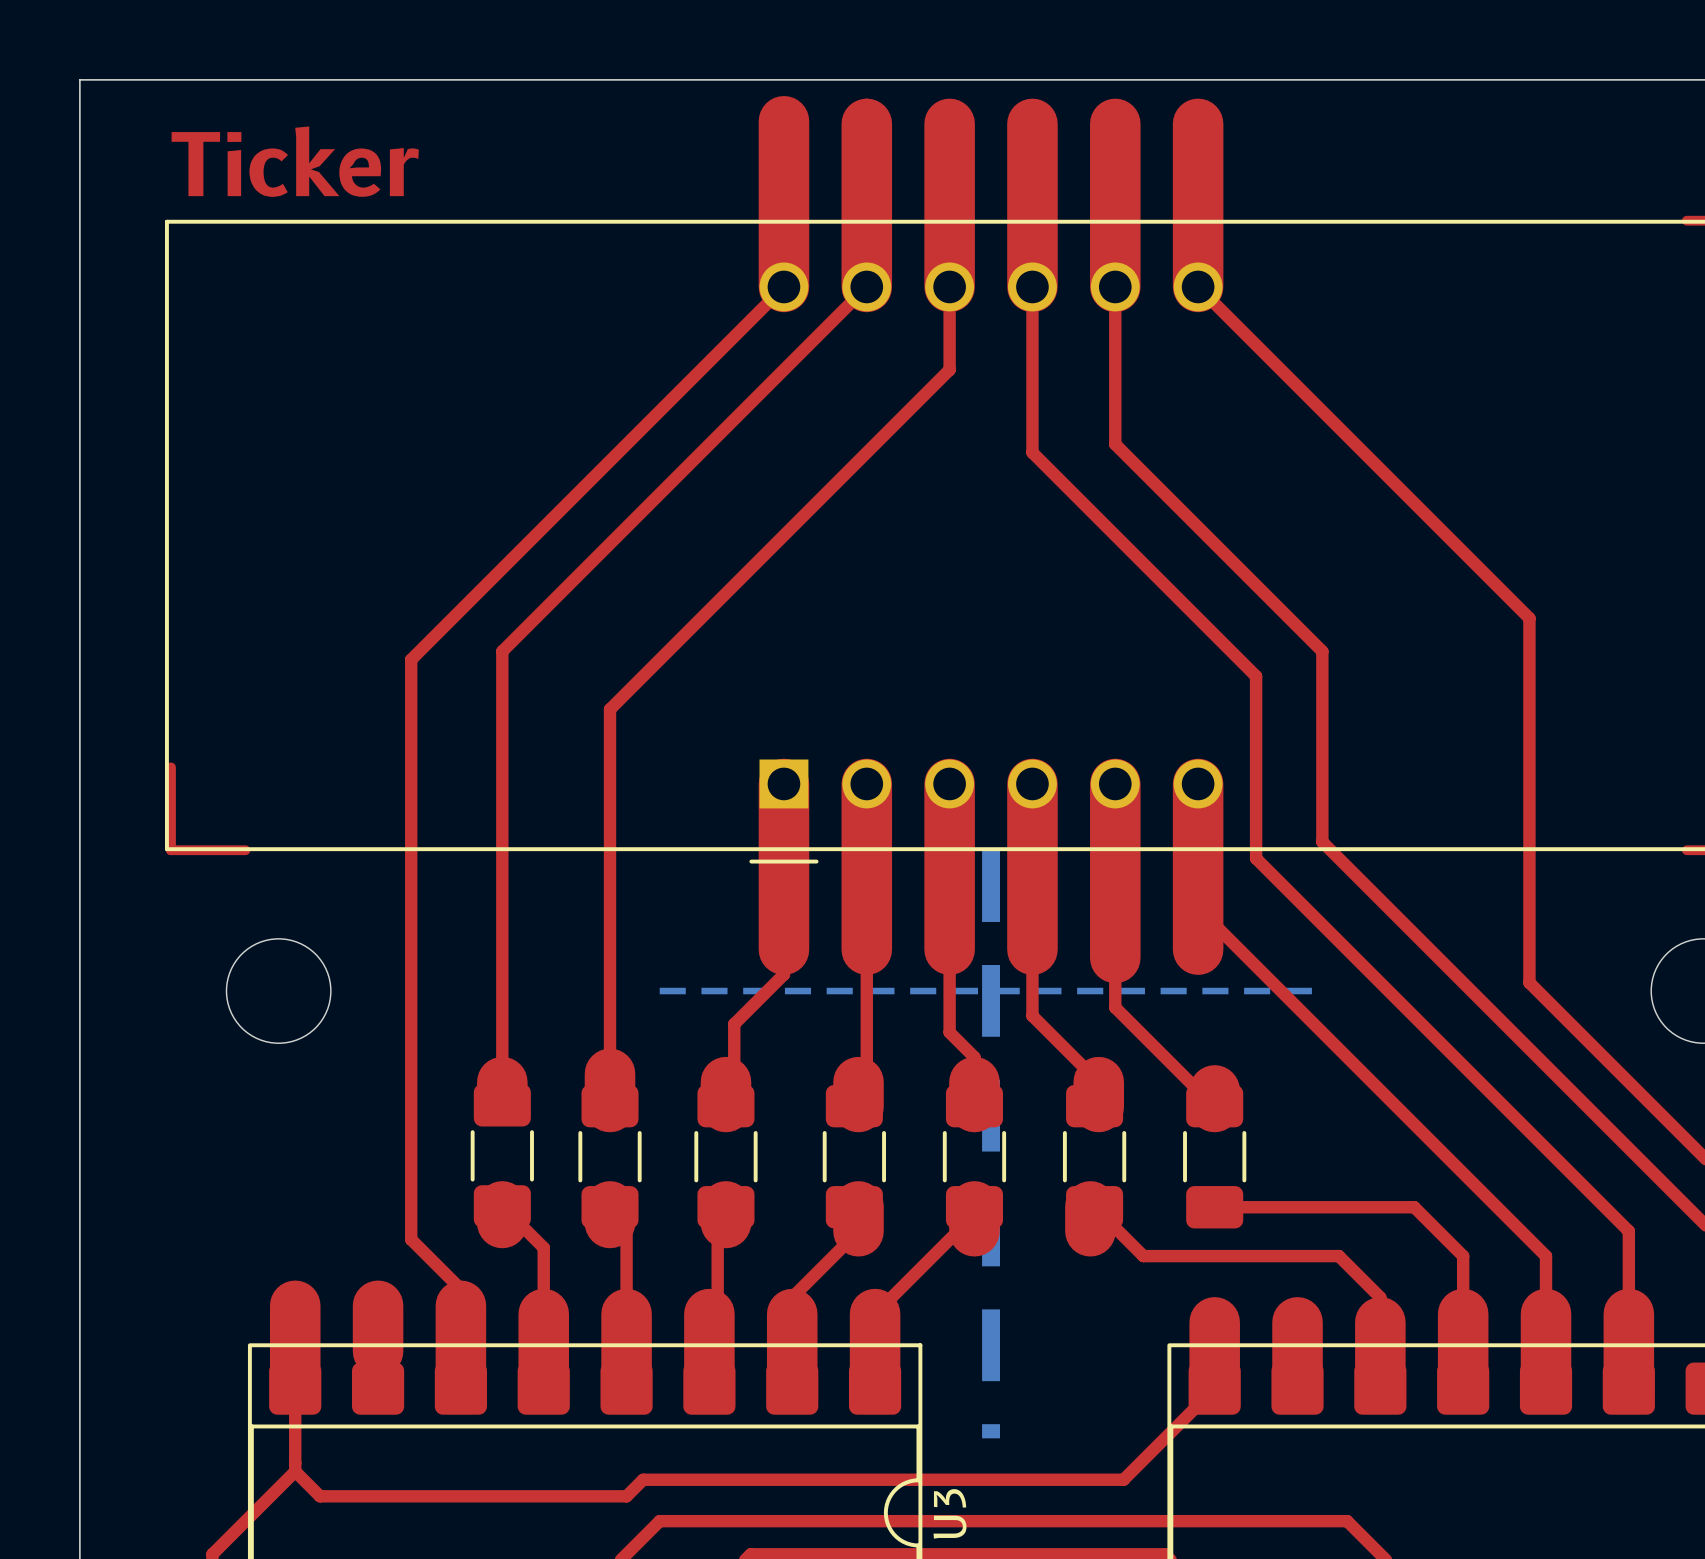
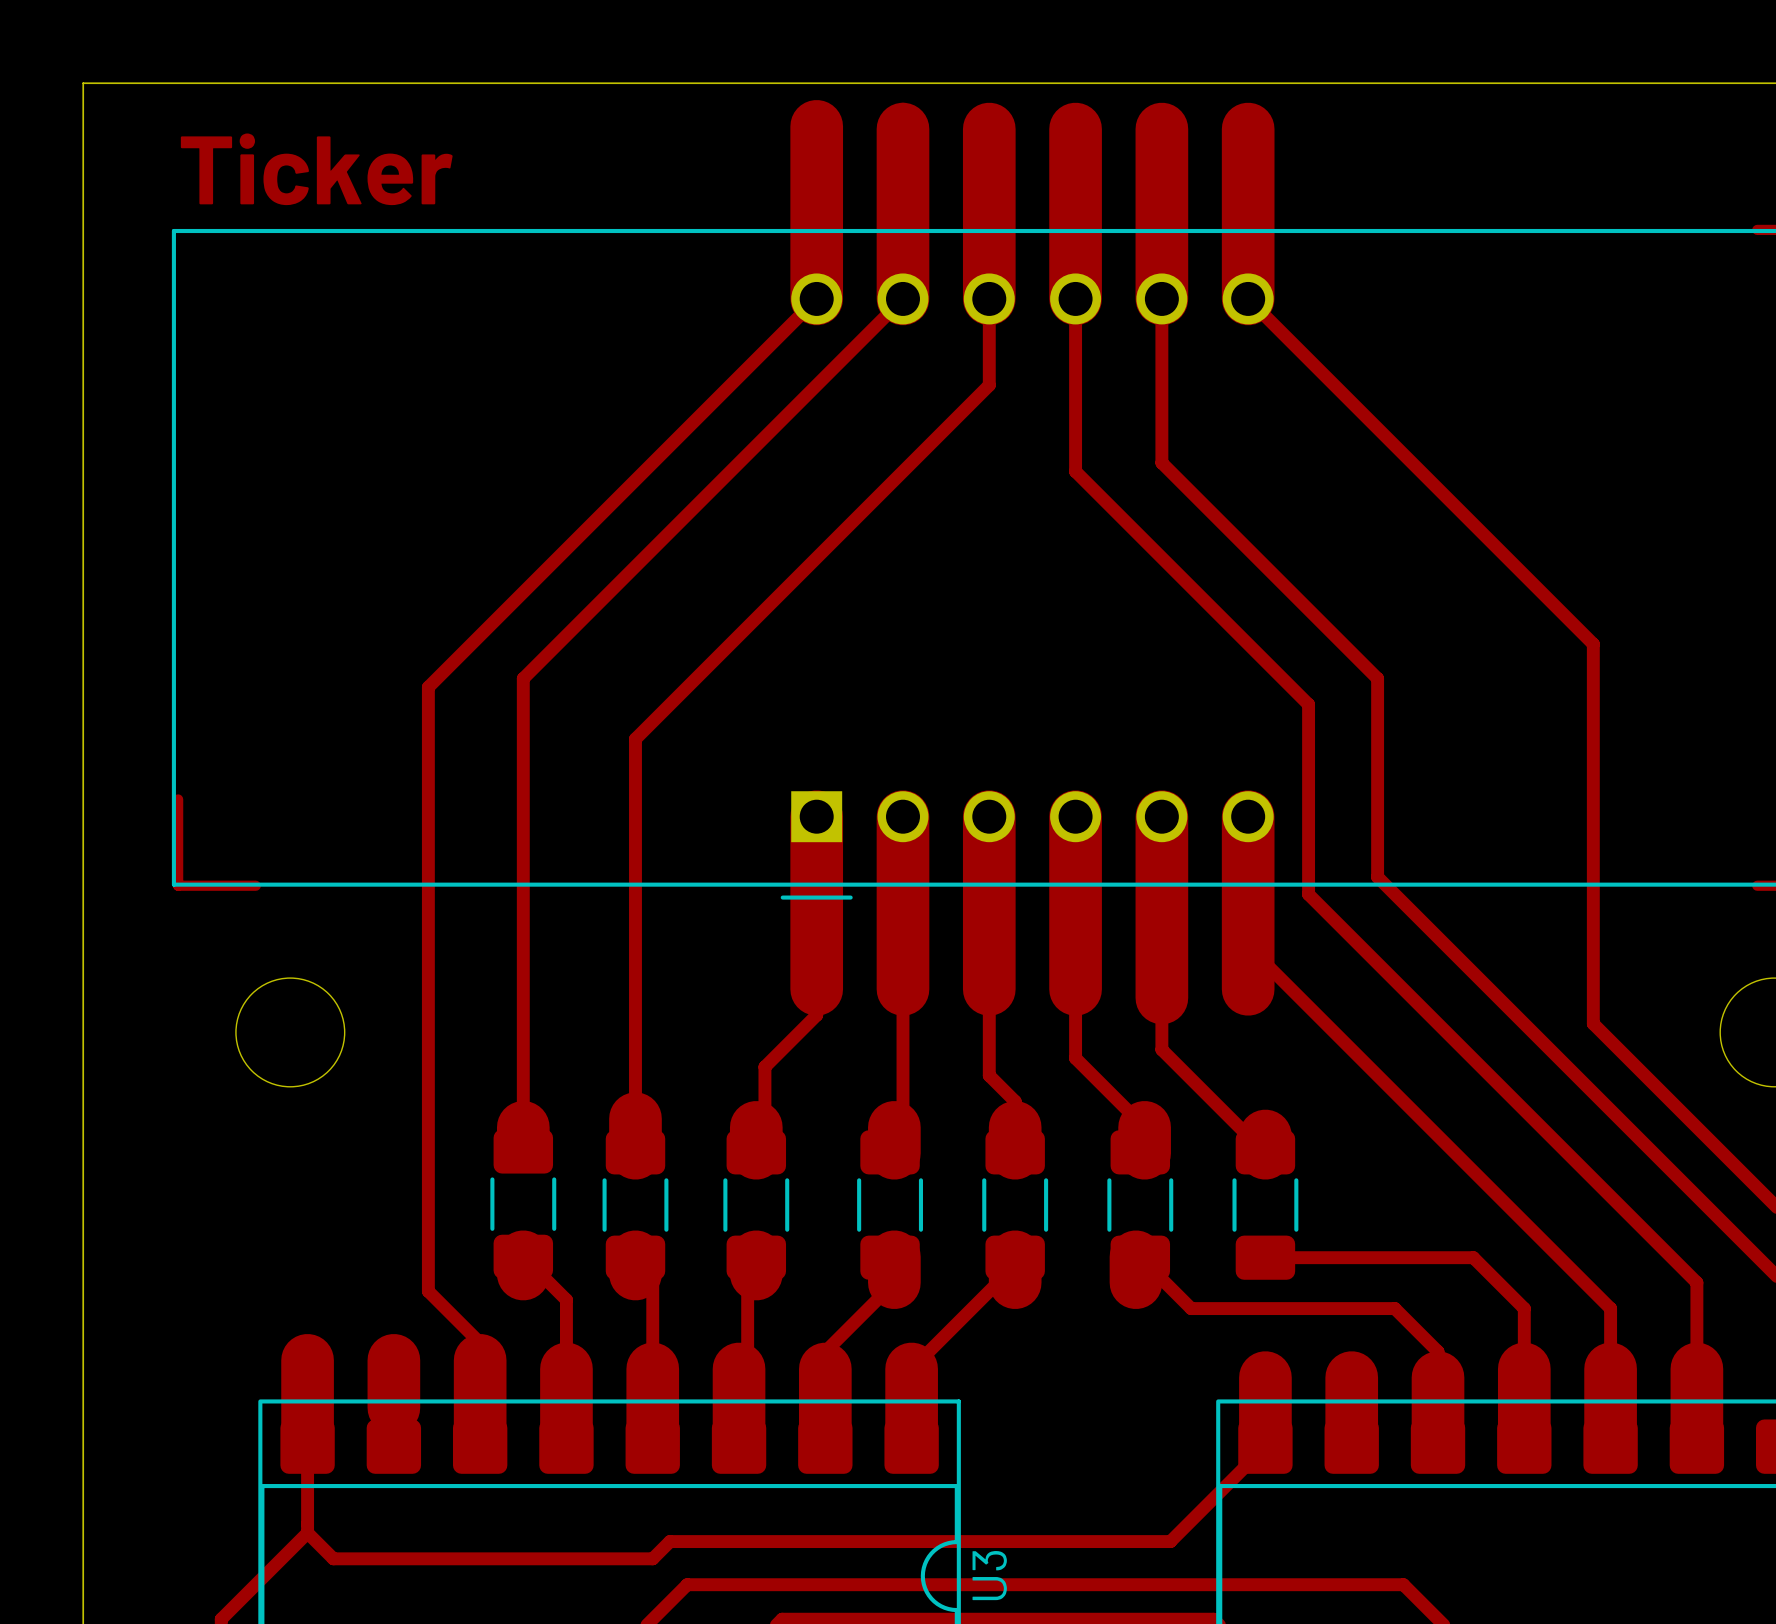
bottom track: (991, 850) (991, 1438) -> none
bottom track: (659, 991) (1322, 991) -> none

